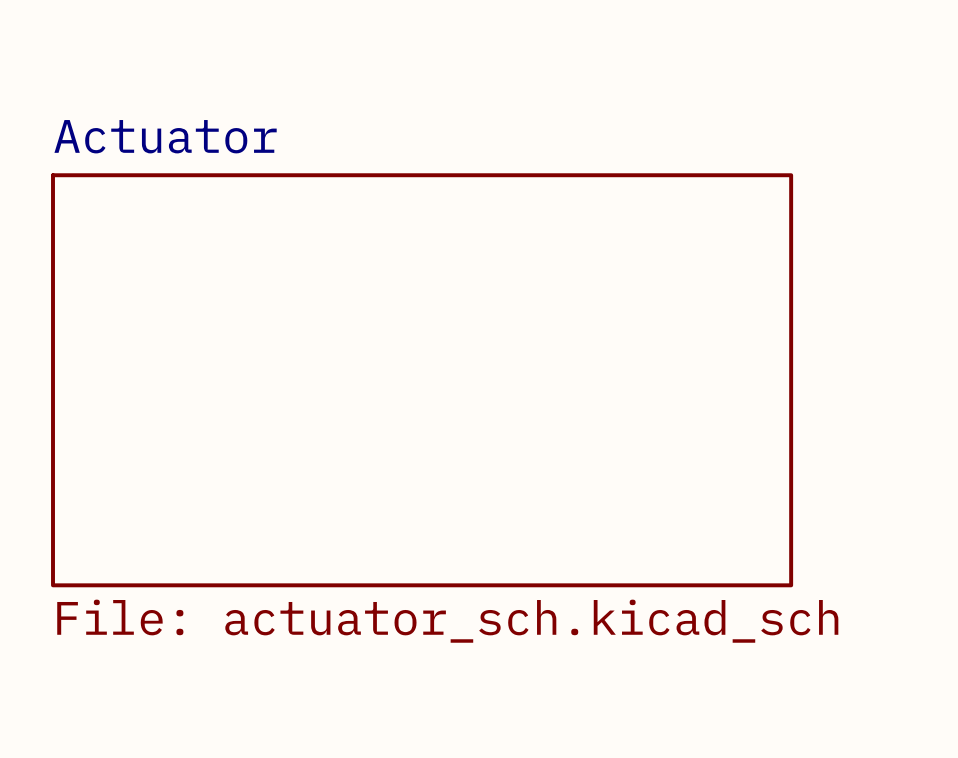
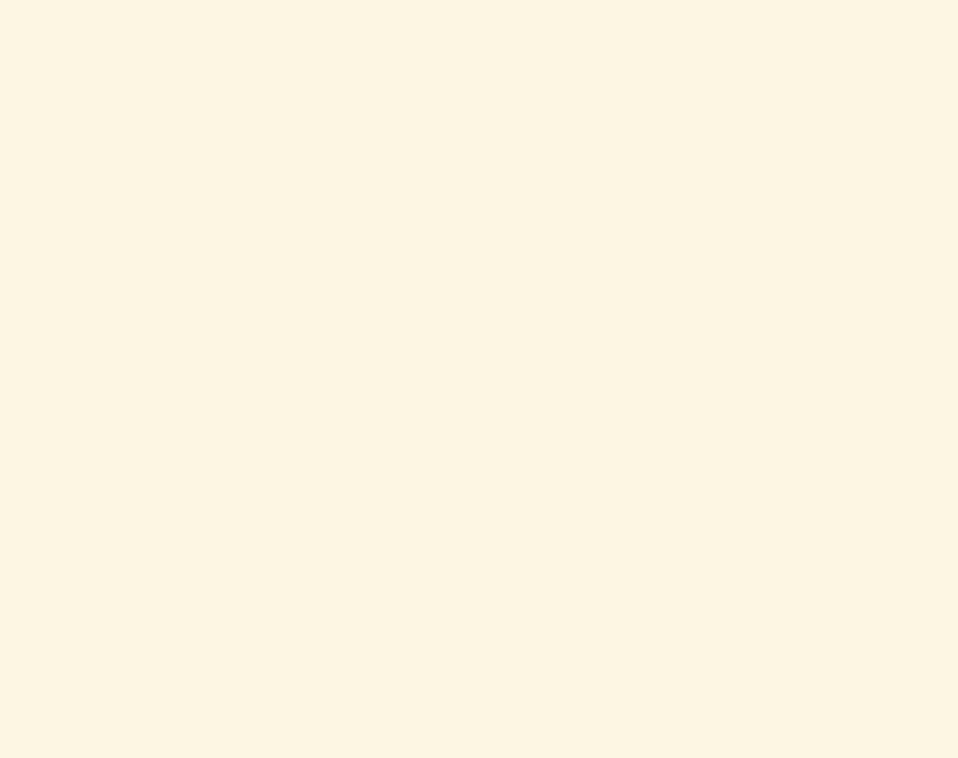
sheet Actuator: File: actuator_sch.kicad_sch (422, 380) -> none

